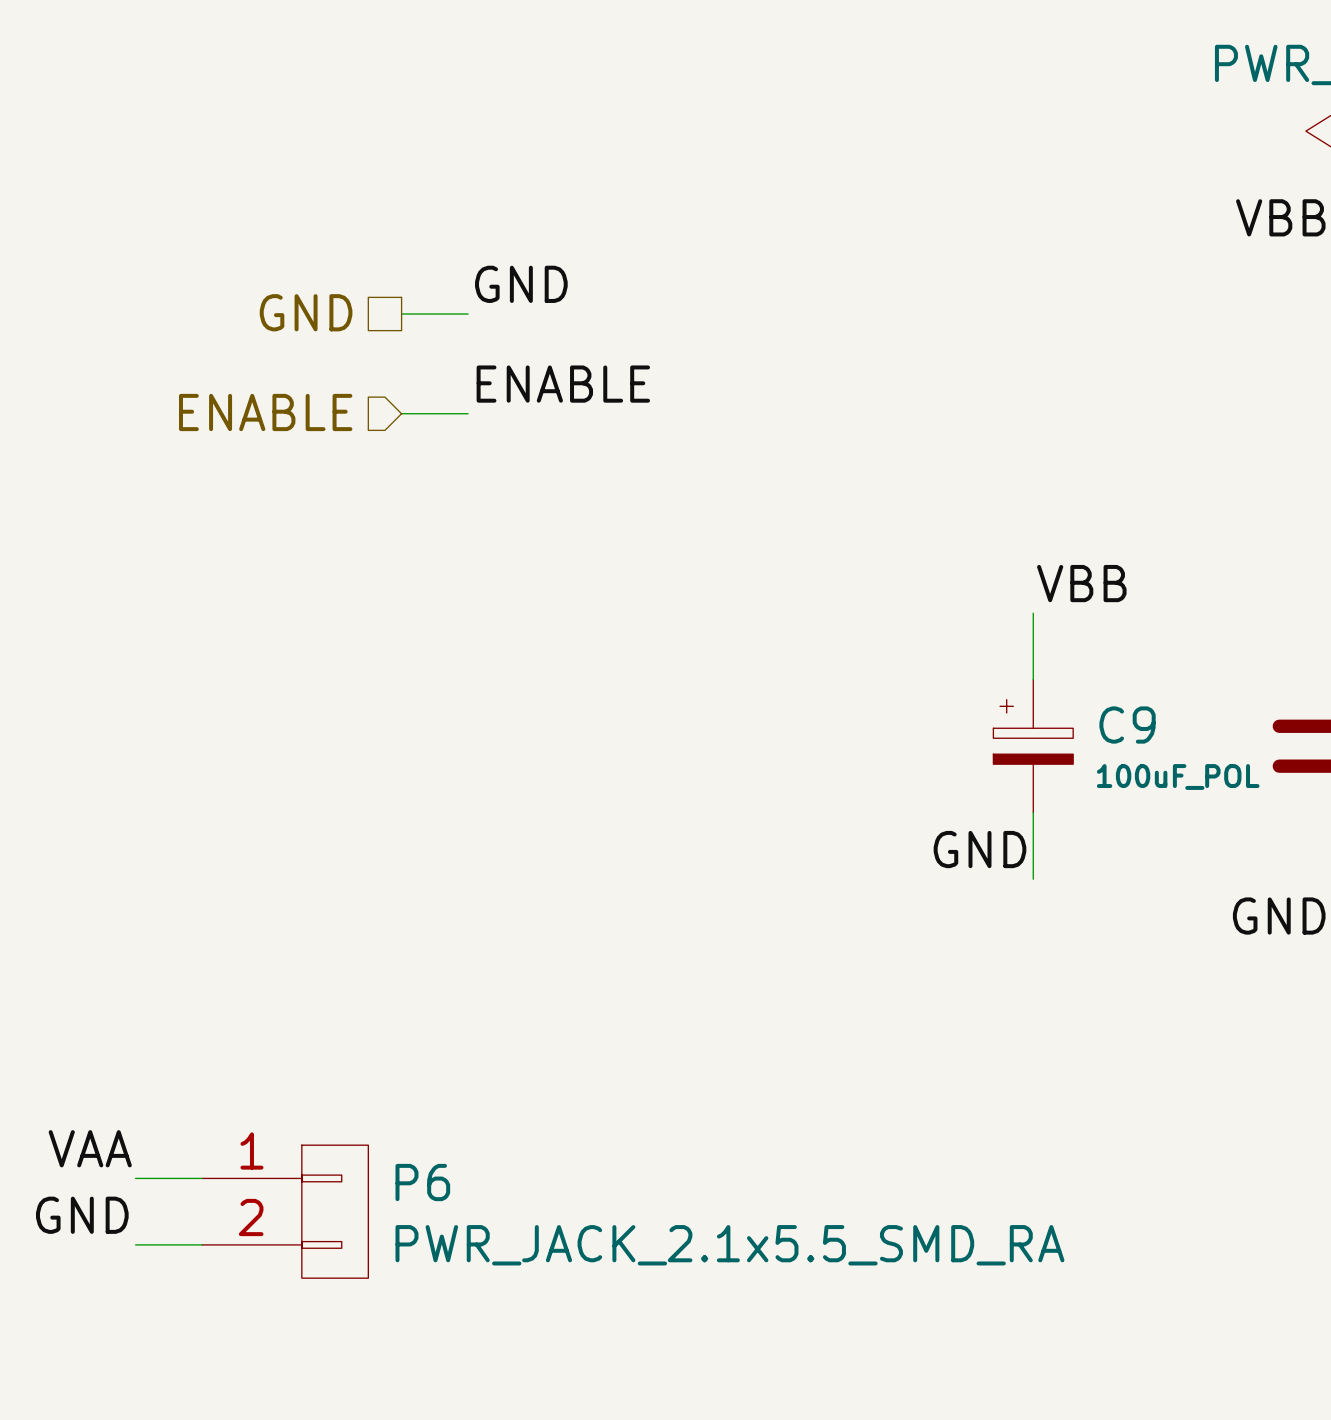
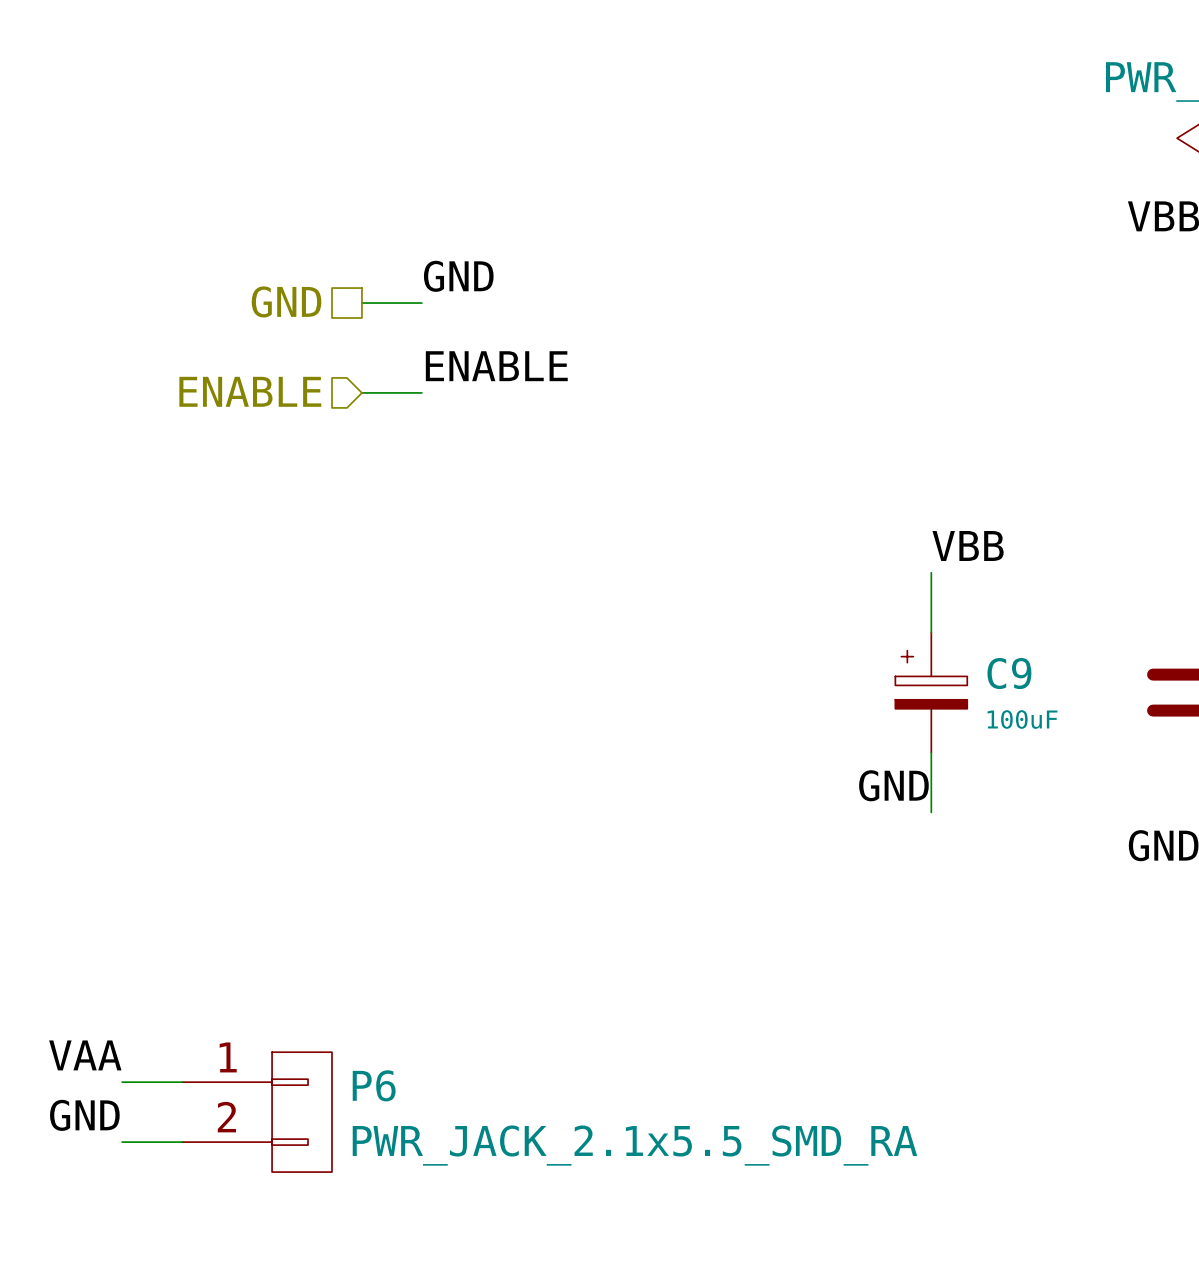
C9 value: 100uF_POL (1178, 777) -> 100uF (1022, 719)

